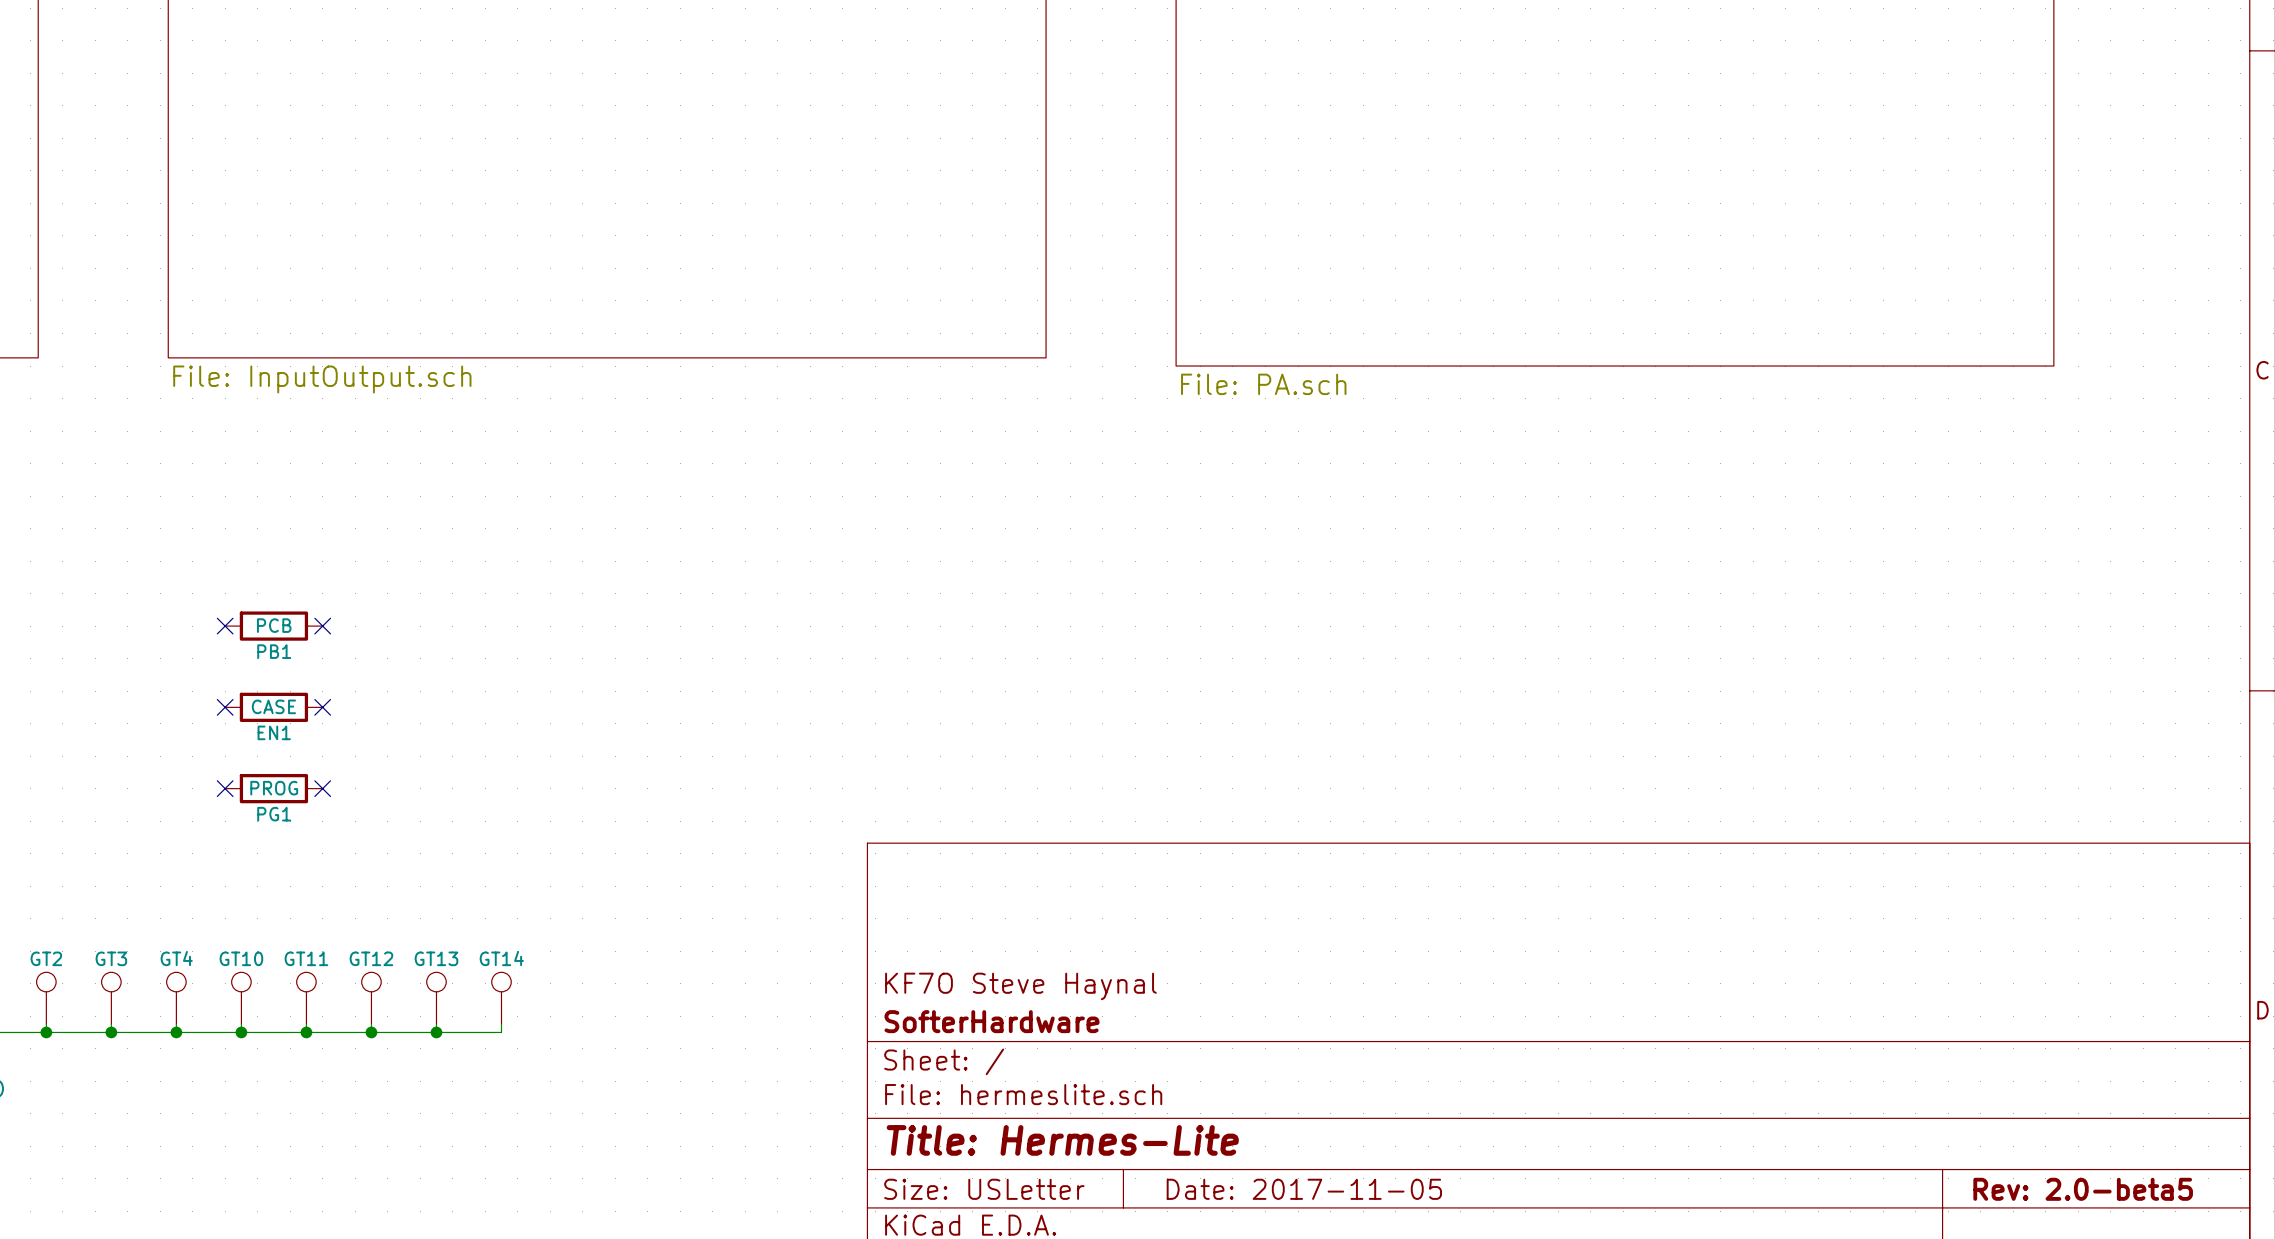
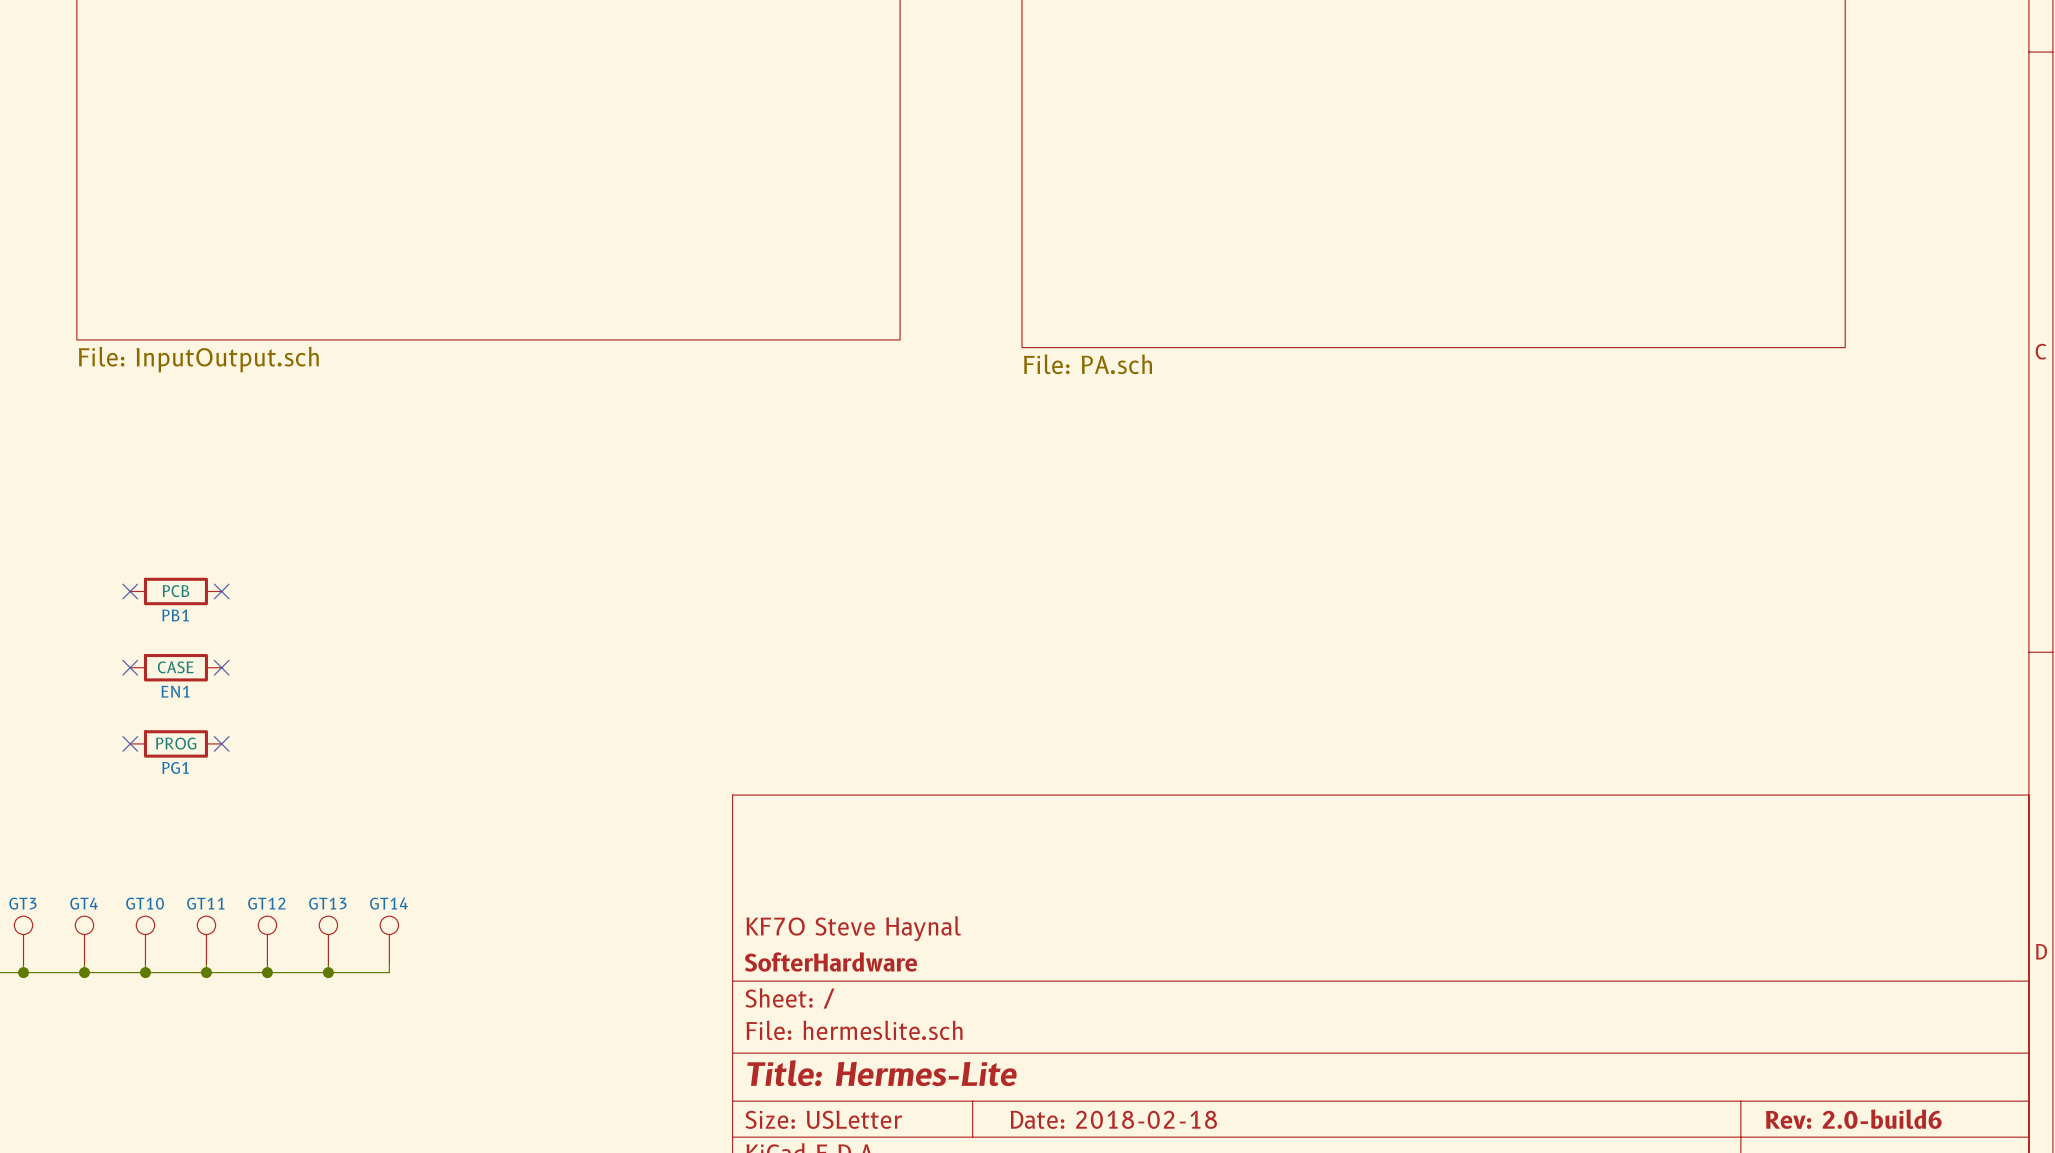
title block: Date: 2017-11-05 (1304, 1189) -> Date: 2018-02-18 (1113, 1119)
title block: Rev: 2.0-beta5 (2083, 1189) -> Rev: 2.0-build6 (1853, 1119)

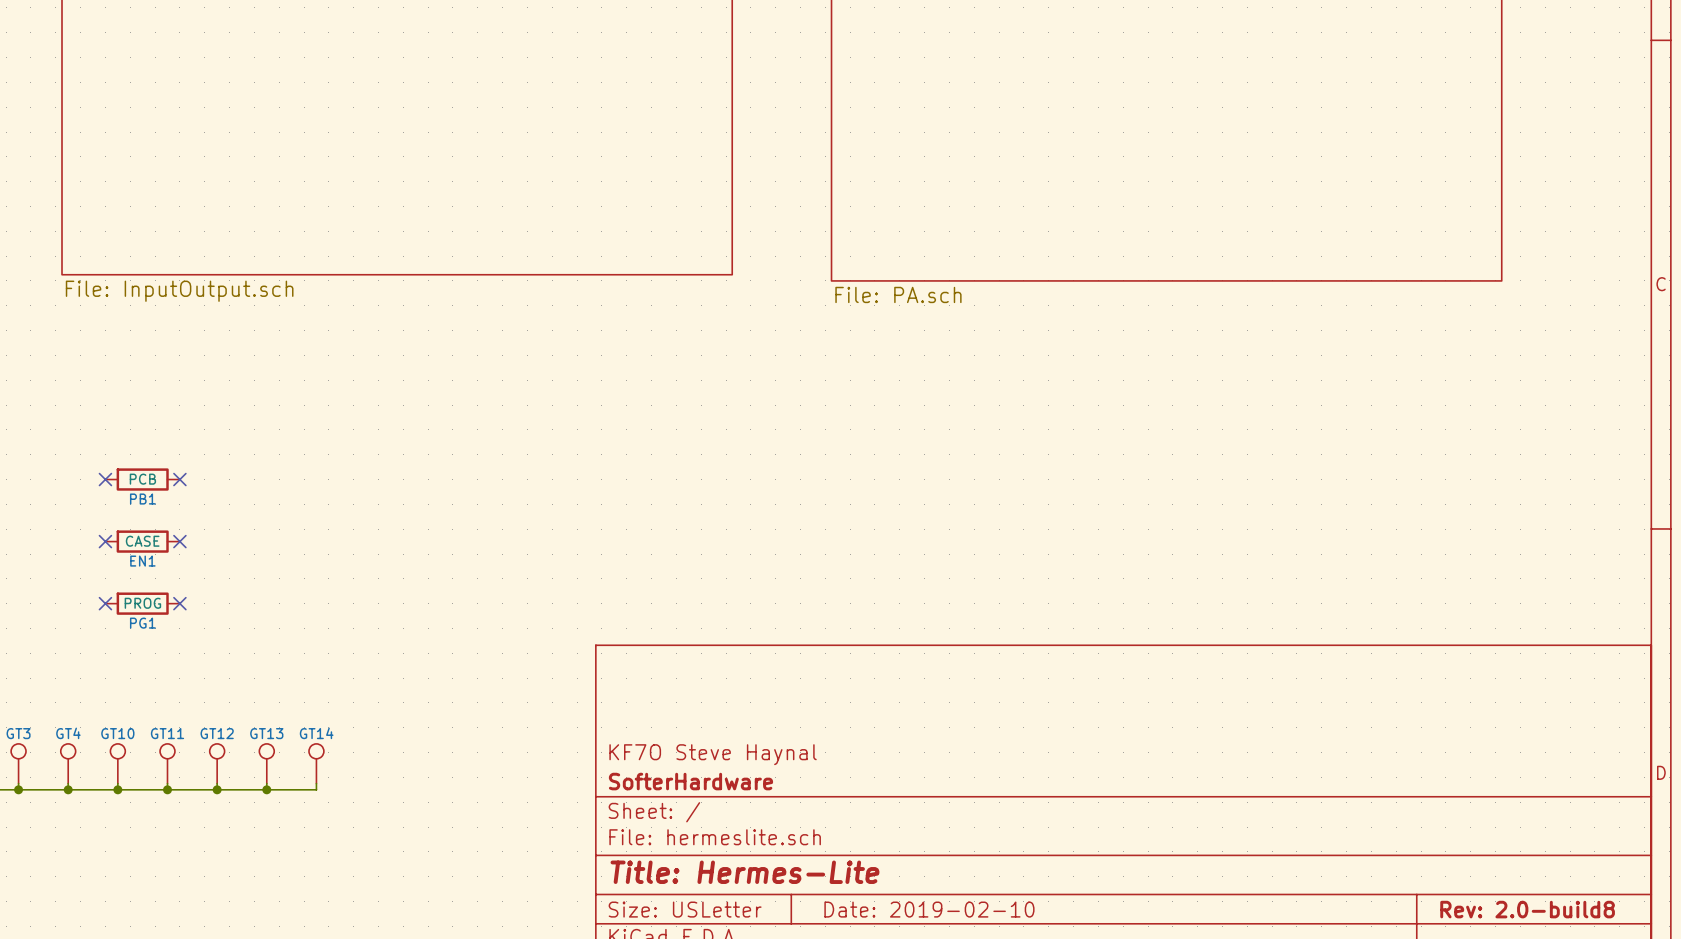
title block: Date: 2018-02-18 (1113, 1119) -> Date: 2019-02-10 (929, 909)
title block: Rev: 2.0-build6 (1853, 1119) -> Rev: 2.0-build8 (1527, 909)

